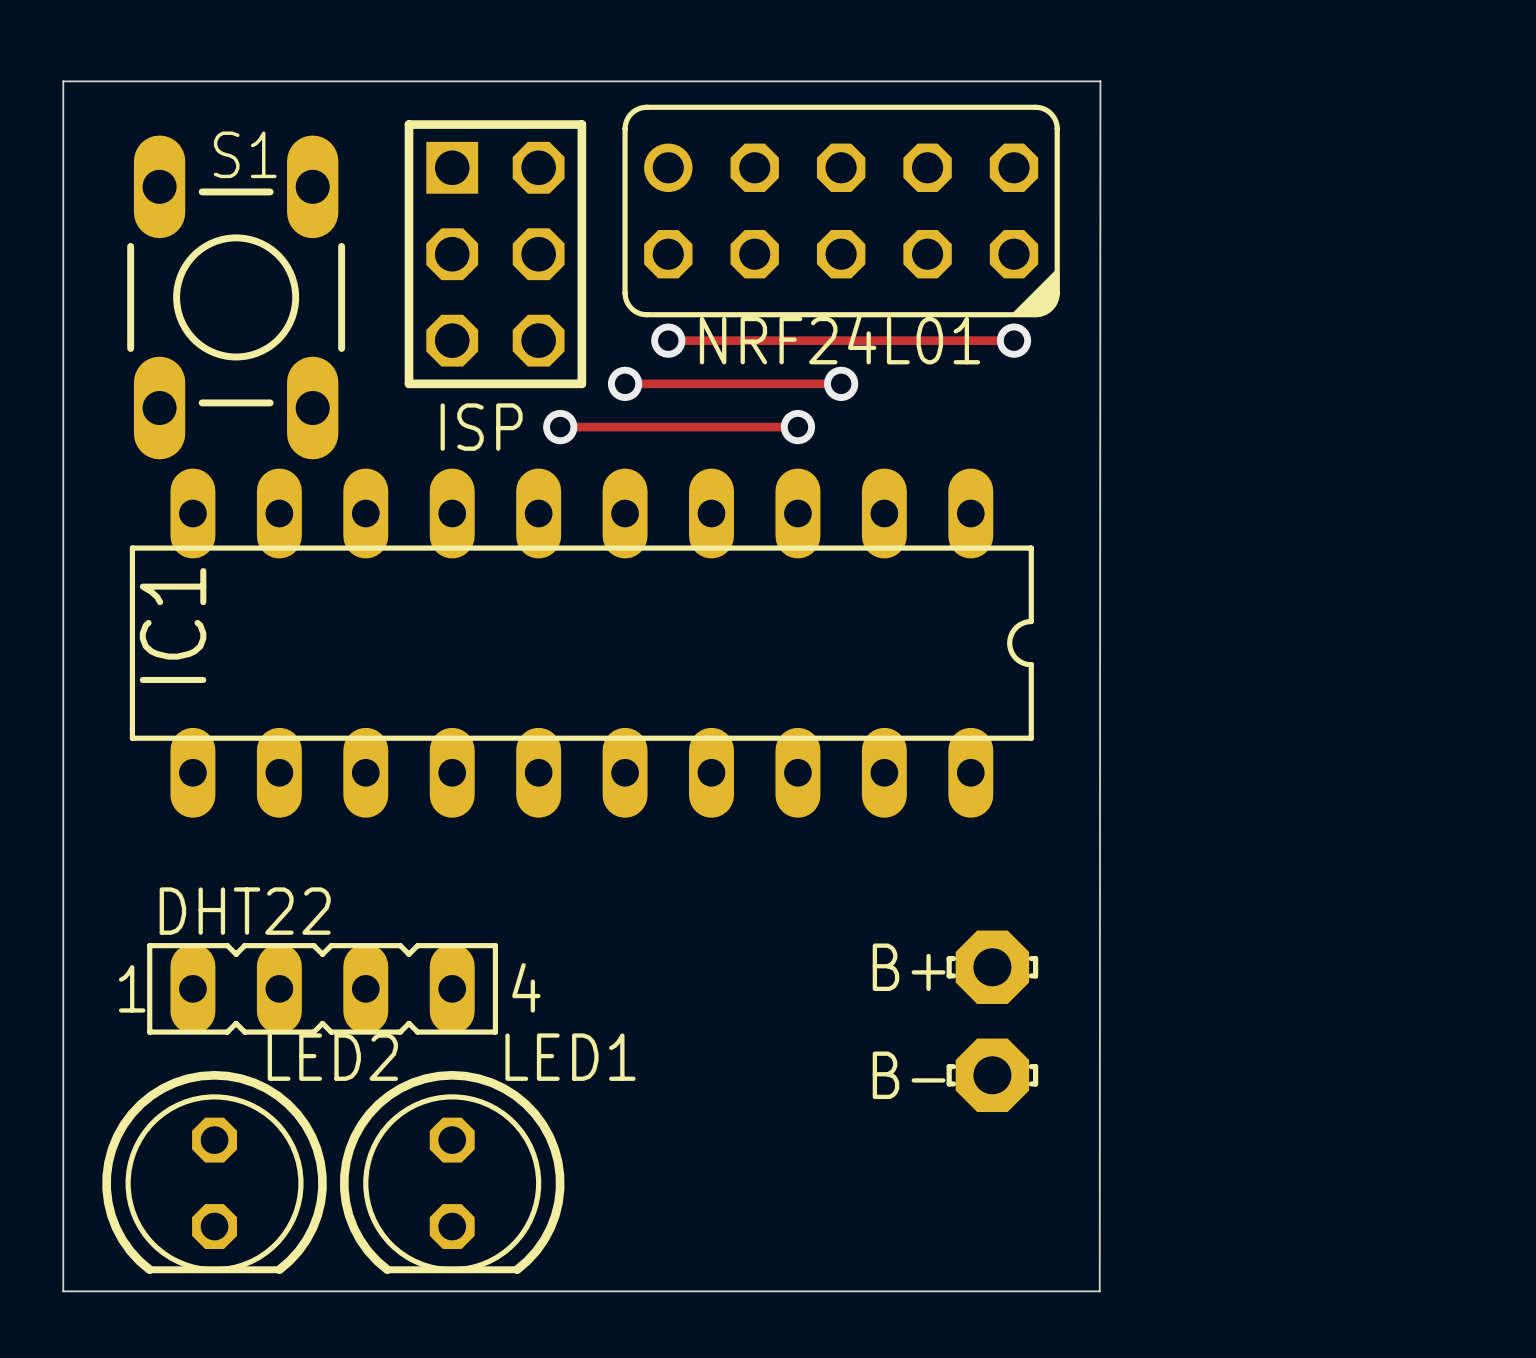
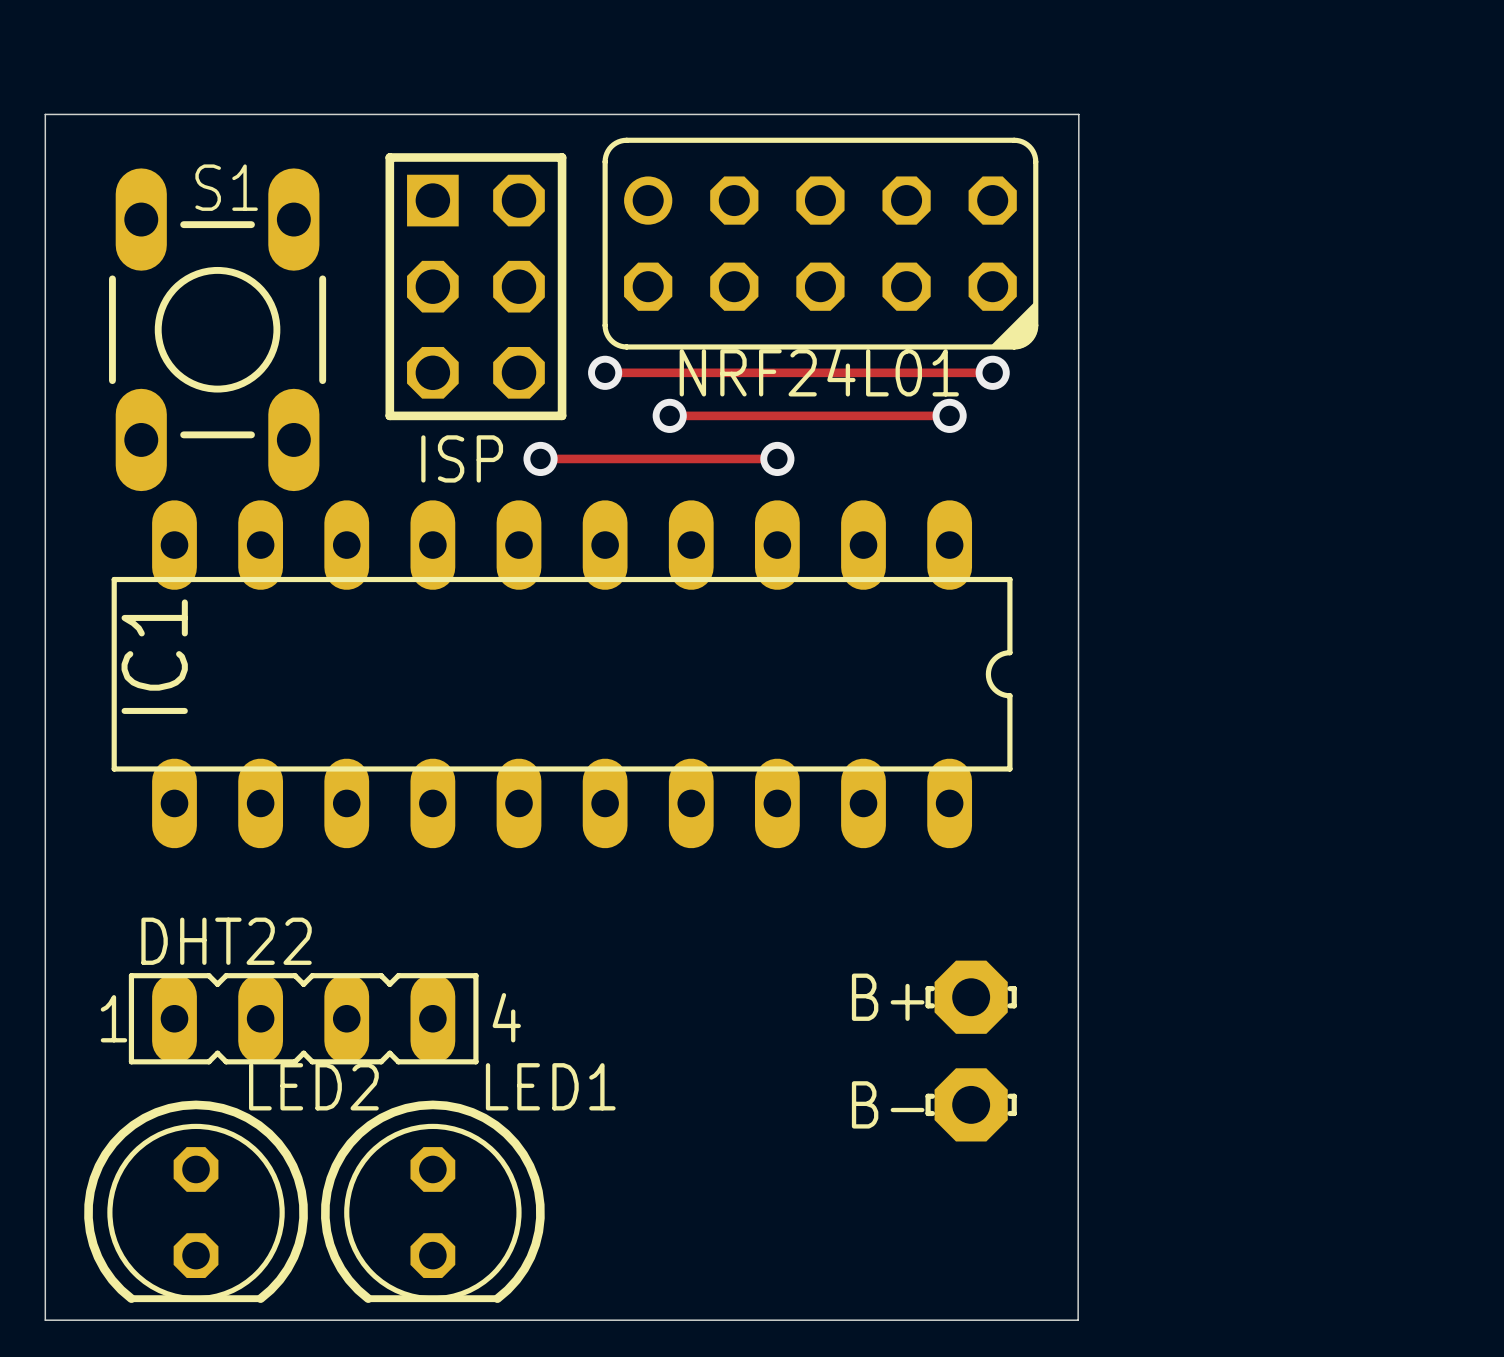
track: none -> (605, 372) (648, 372)
via: none -> (605, 372)
via: (668, 340) -> none
track: (625, 383) (689, 383) -> none
via: (625, 383) -> none
via: none -> (669, 415)
track: none -> (820, 415) (949, 415)
via: (841, 383) -> none
via: none -> (949, 415)

